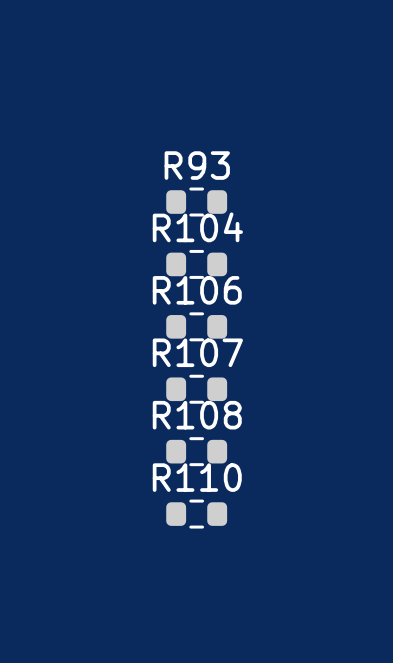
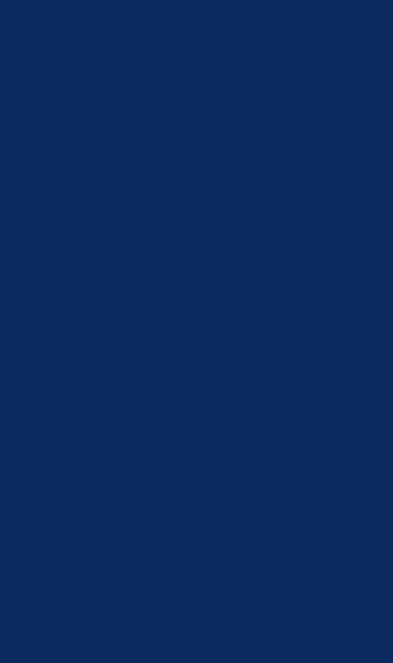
R93: (196, 202) -> none
R104: (196, 264) -> none
R106: (196, 326) -> none
R107: (196, 389) -> none
R108: (196, 451) -> none
R110: (196, 514) -> none

